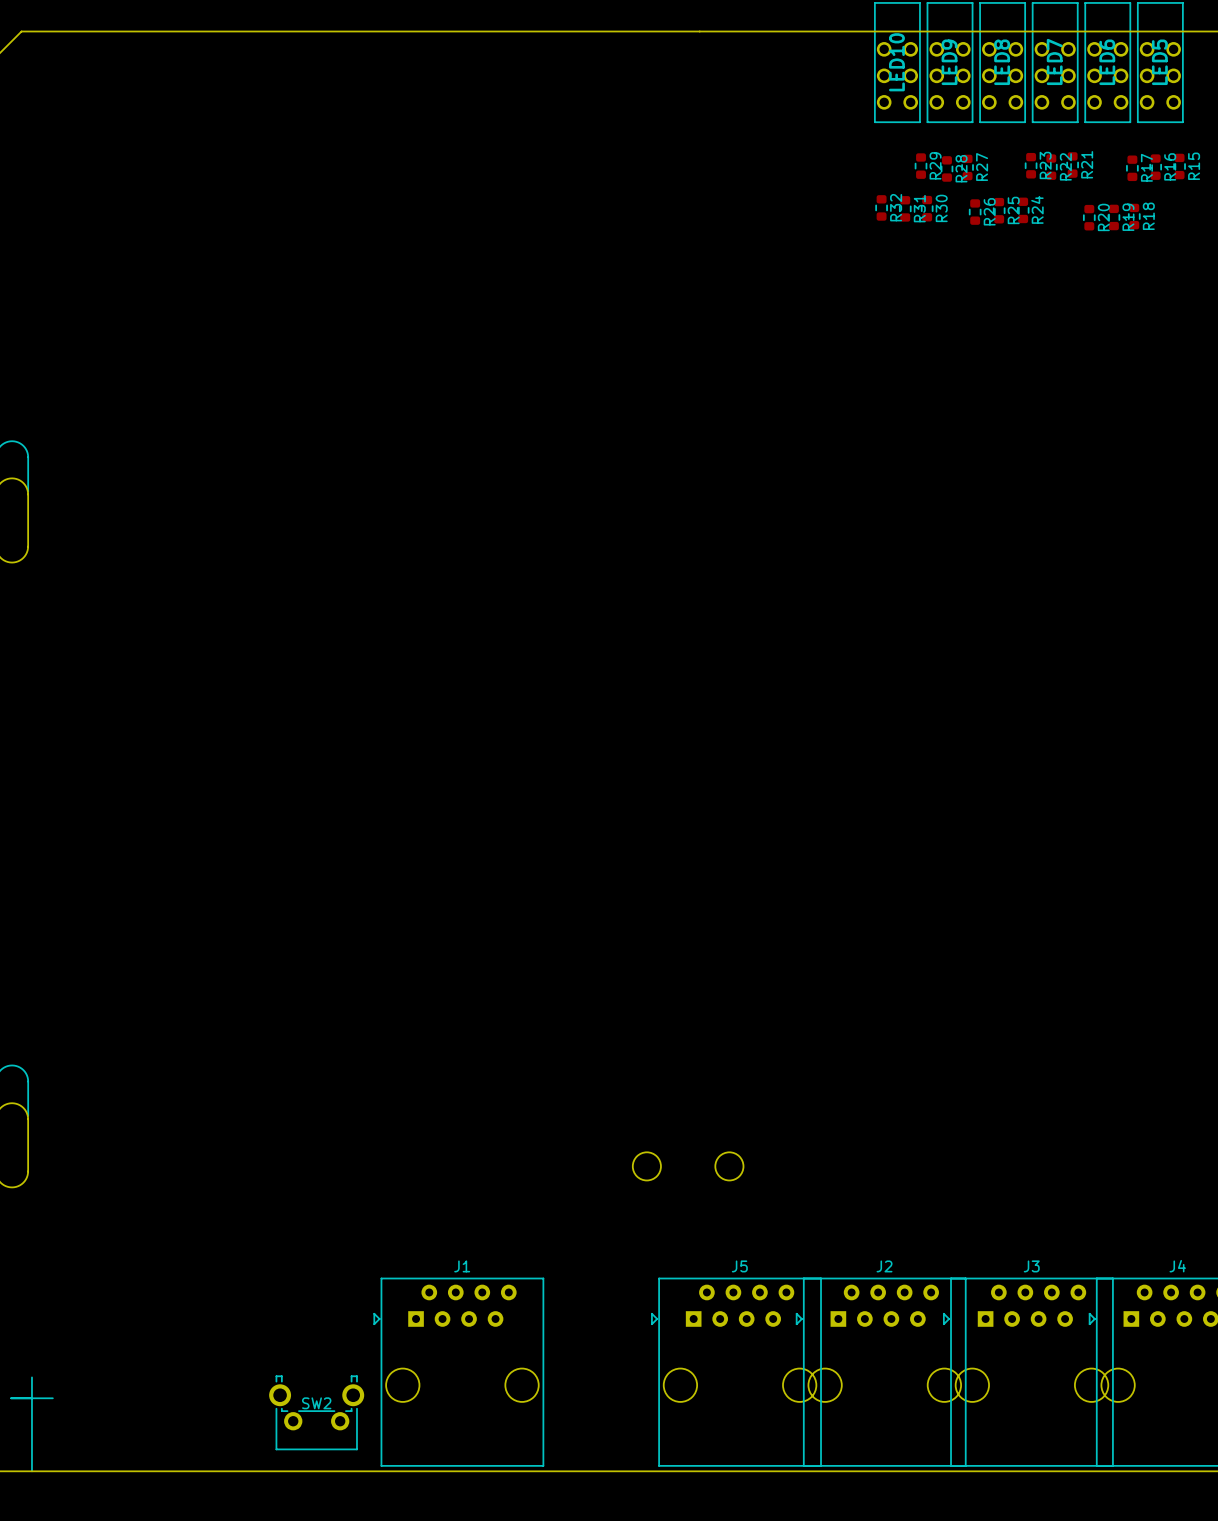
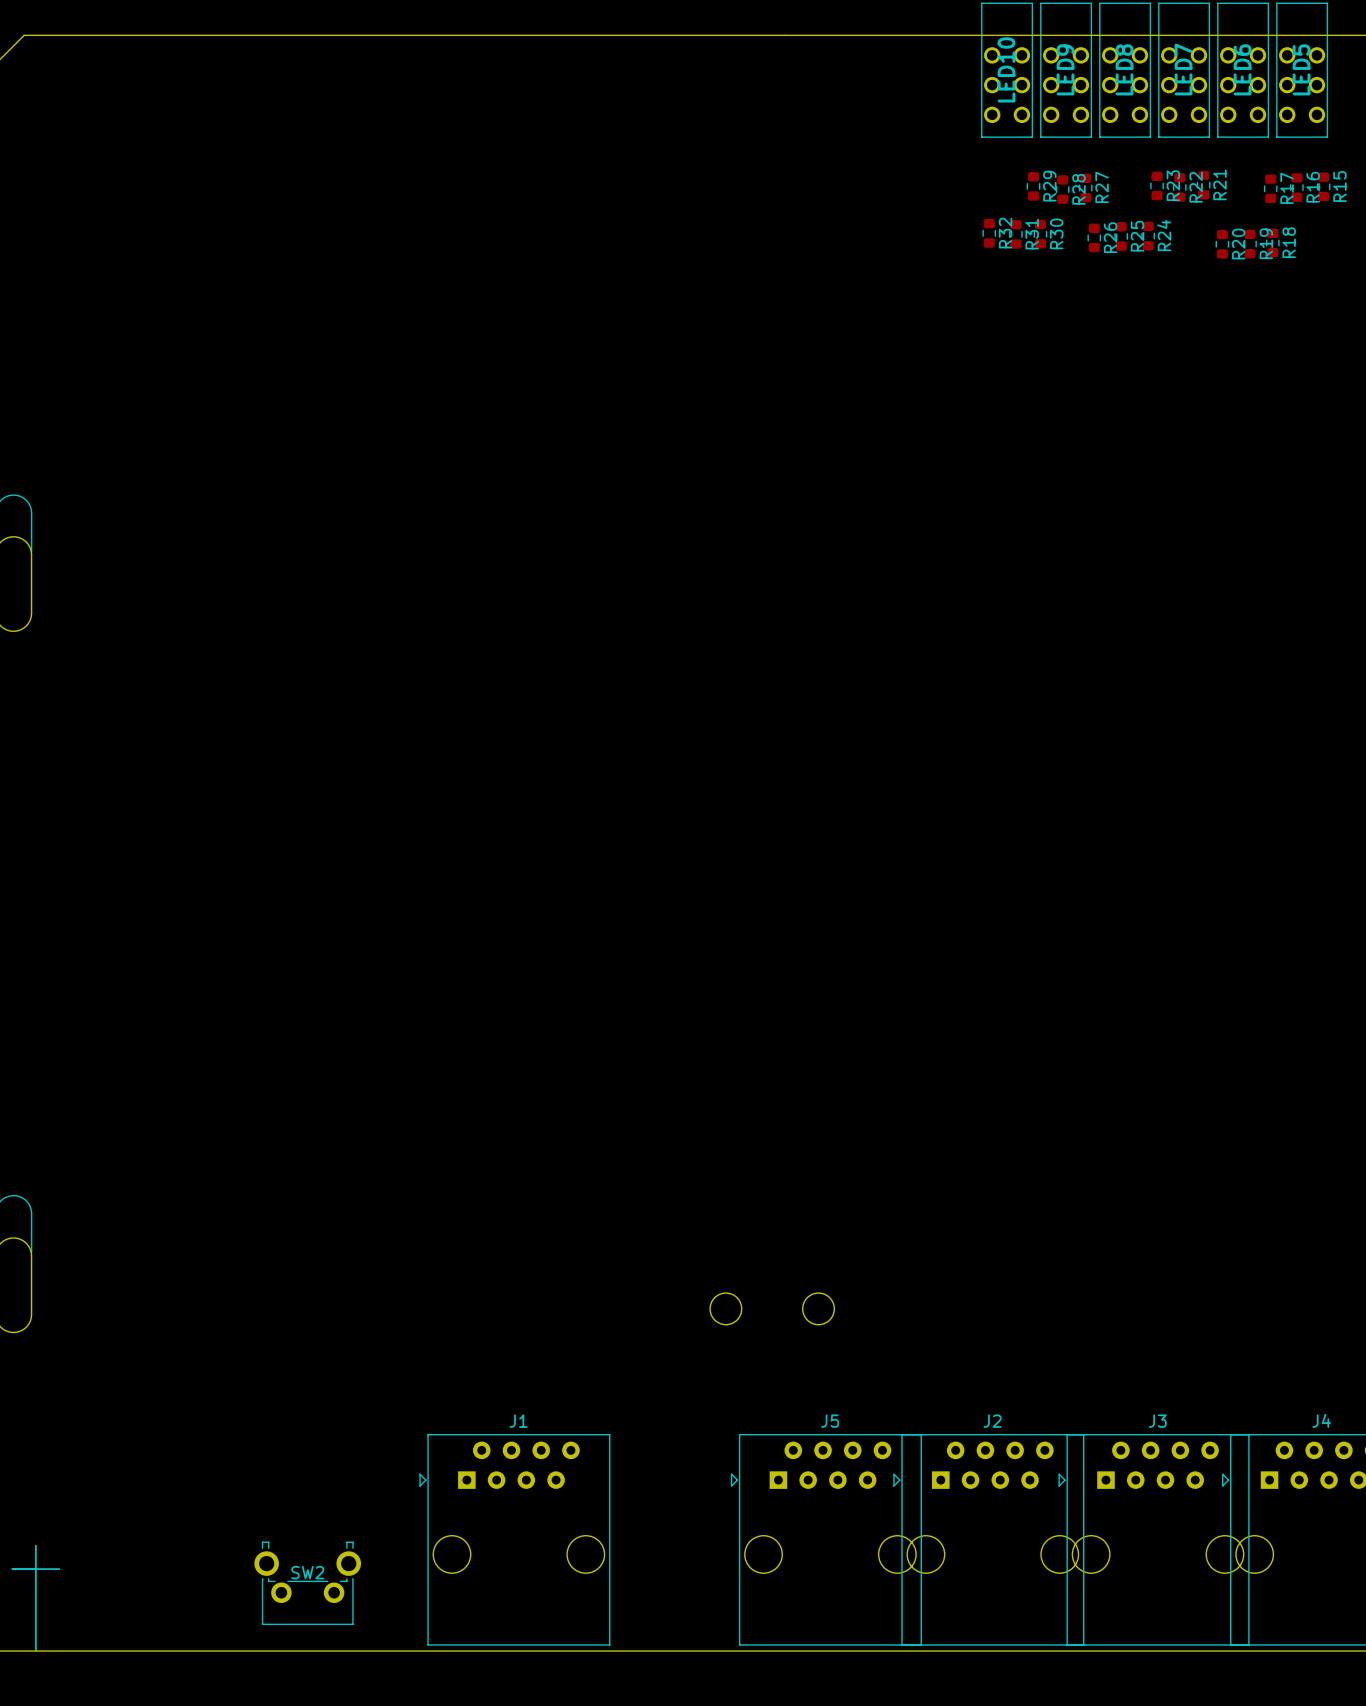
SW2 position: (316, 1412) -> (307, 1583)

